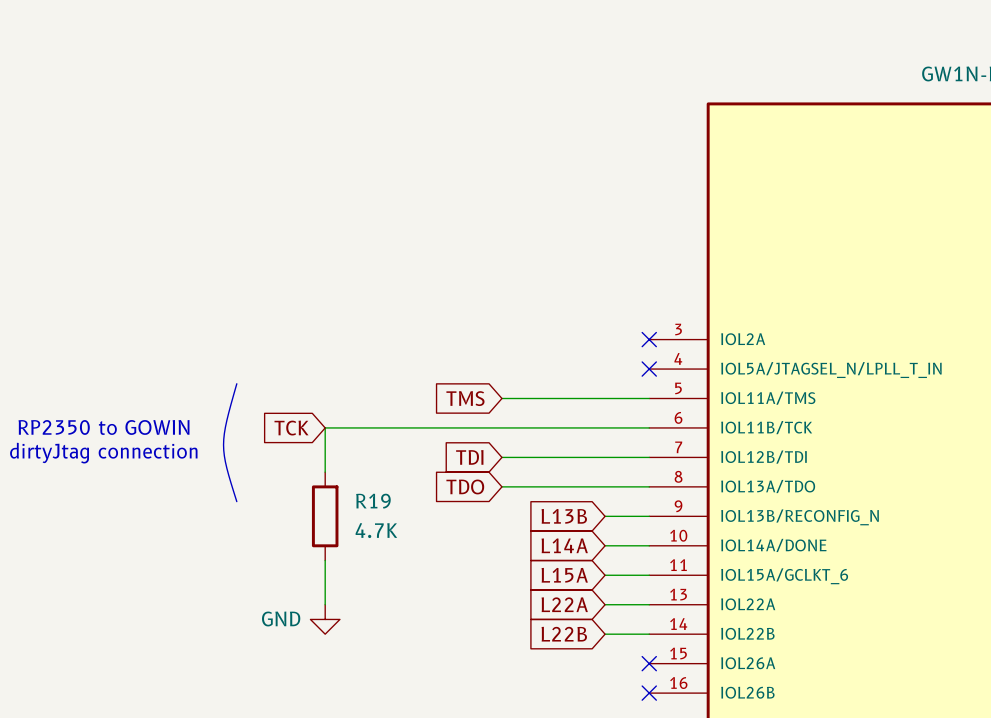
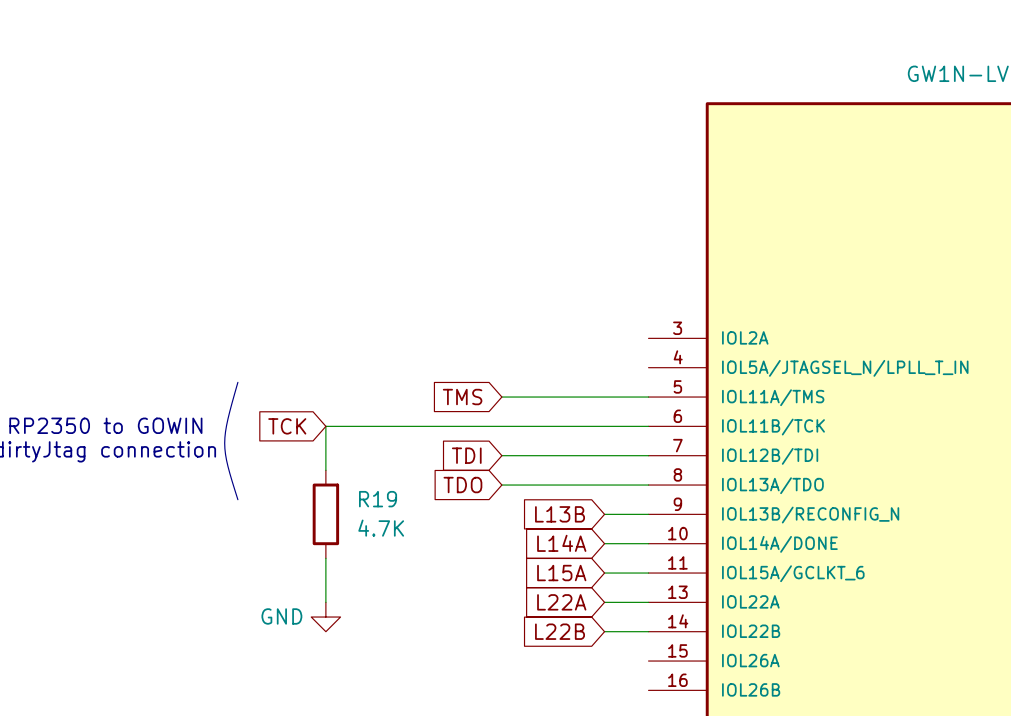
no-connect mark: (649, 339) -> none
no-connect mark: (649, 369) -> none
no-connect mark: (649, 663) -> none
no-connect mark: (649, 693) -> none

